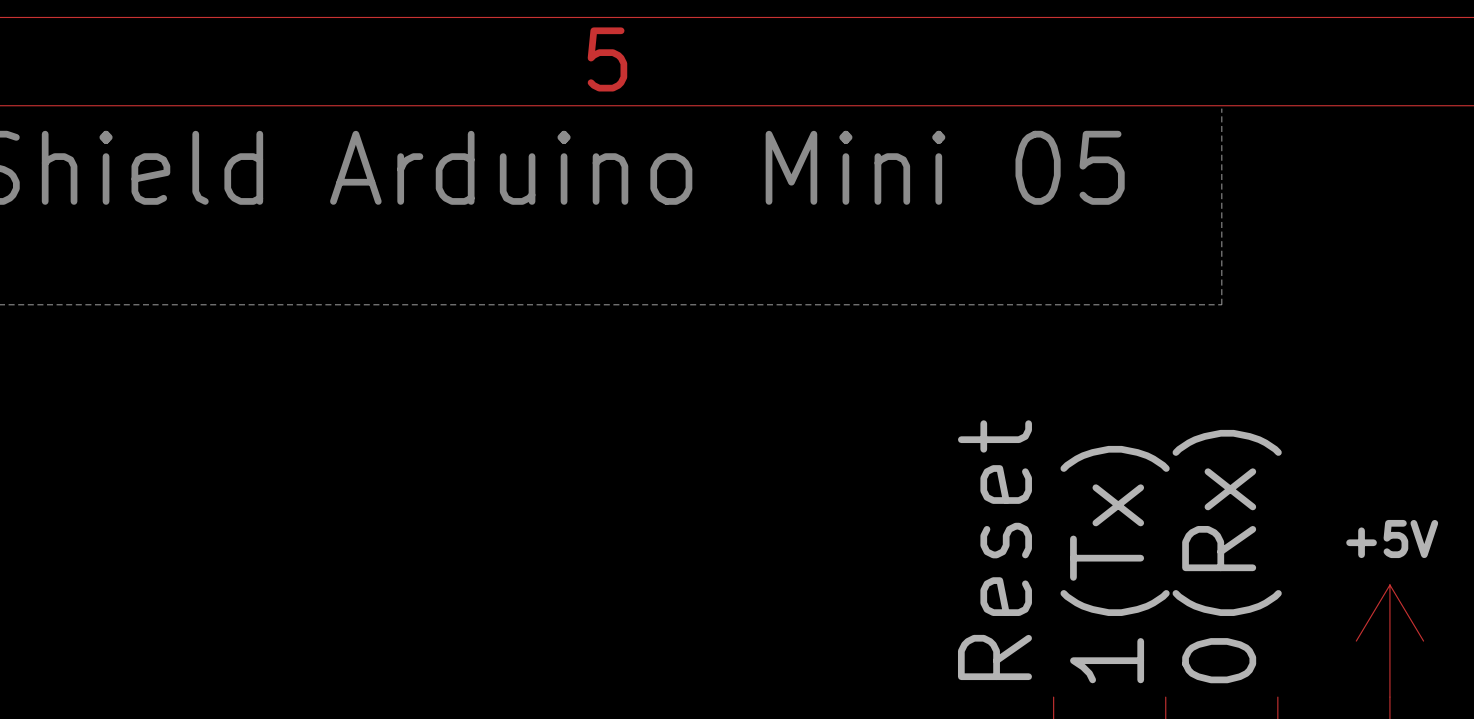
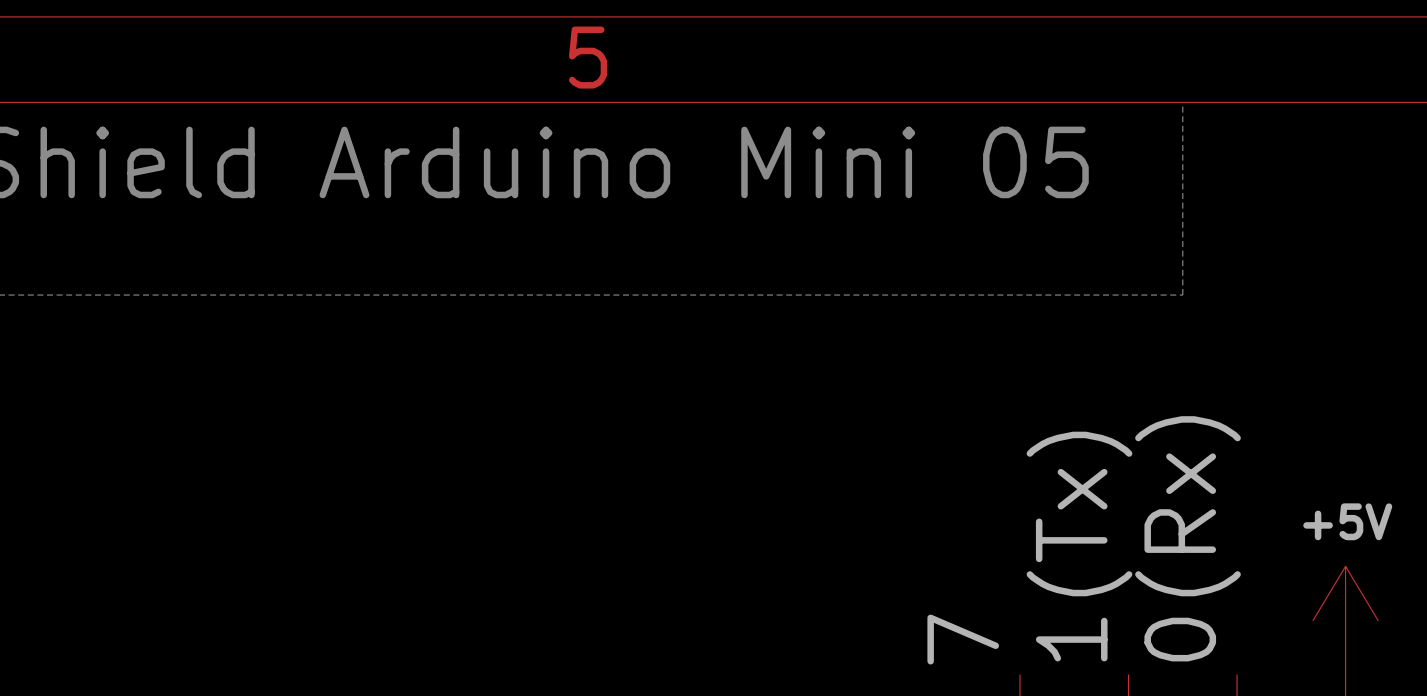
label: Reset (994, 550) -> 7 (963, 639)

